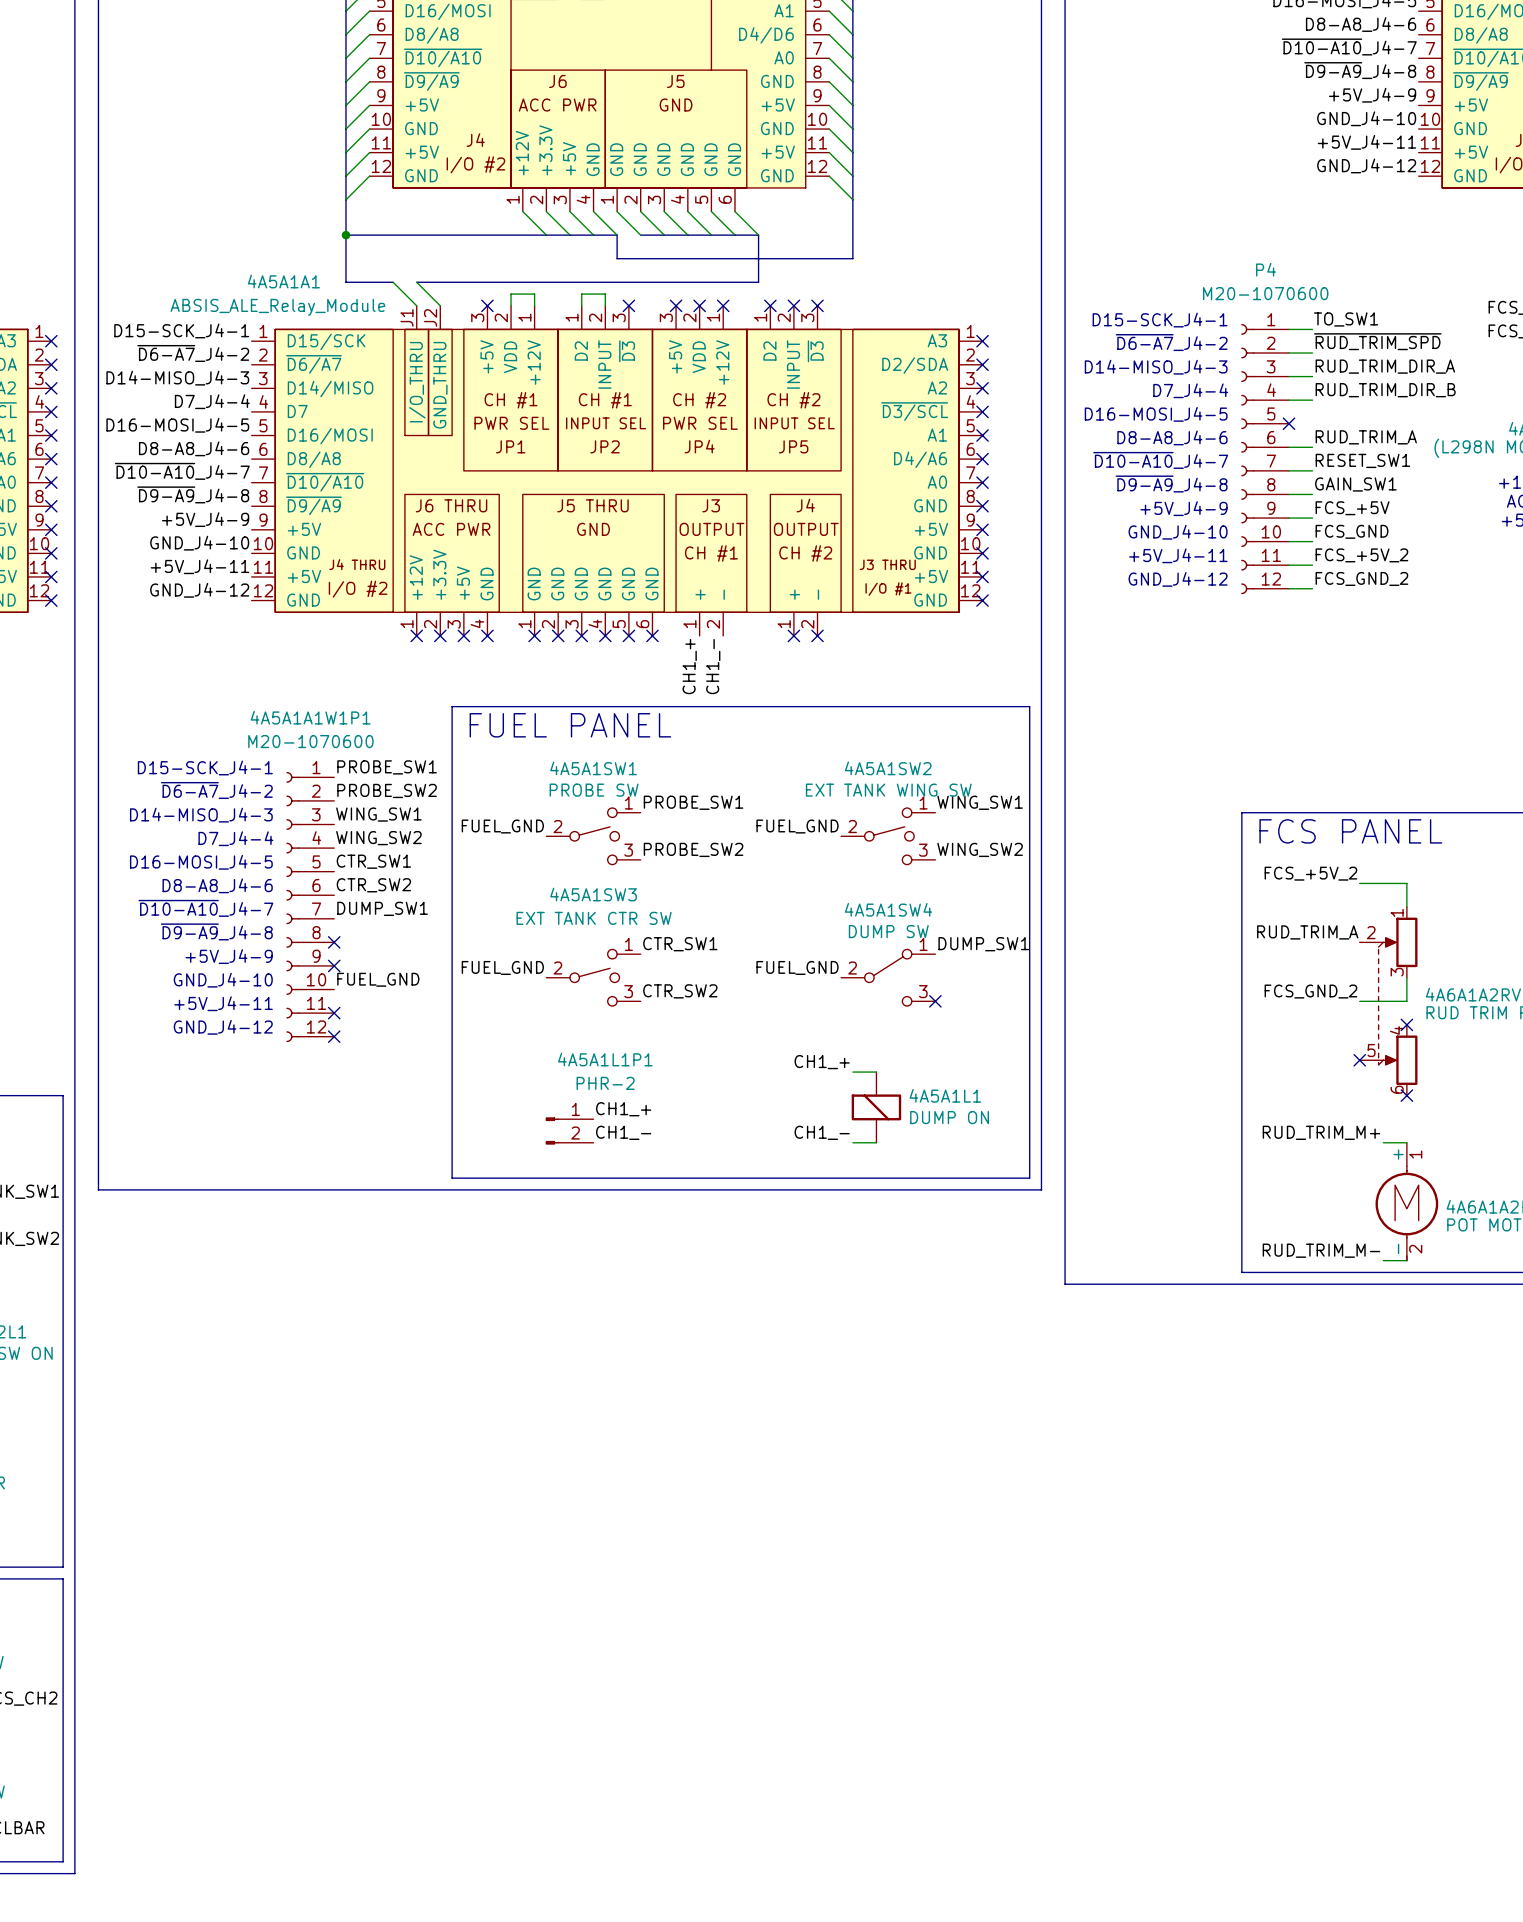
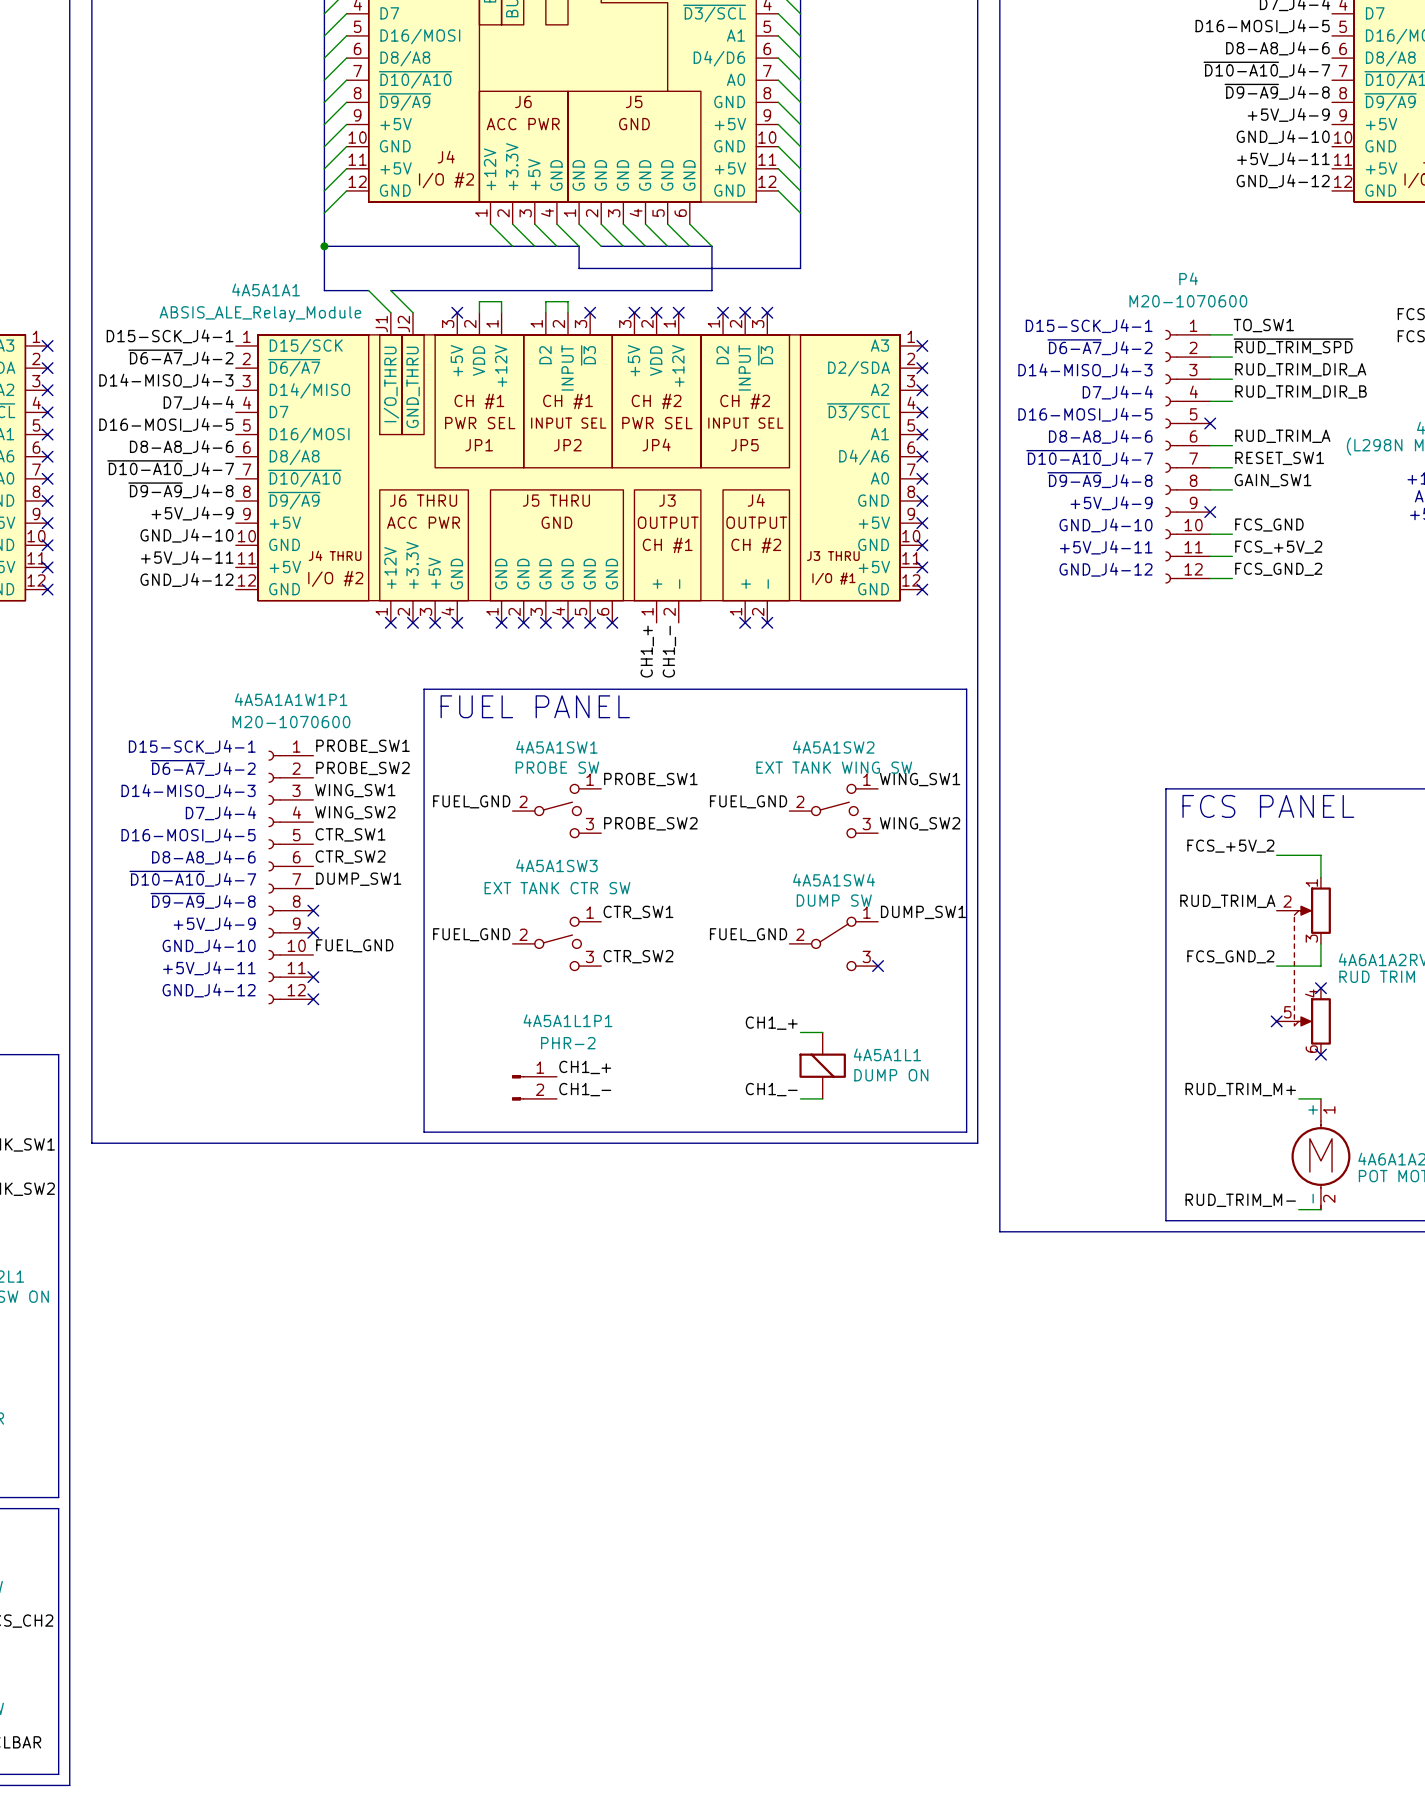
label: FCS_+5V (1352, 508) -> none
wire: (1289, 518) (1312, 518) -> none
no-connect mark: none -> (1210, 512)

